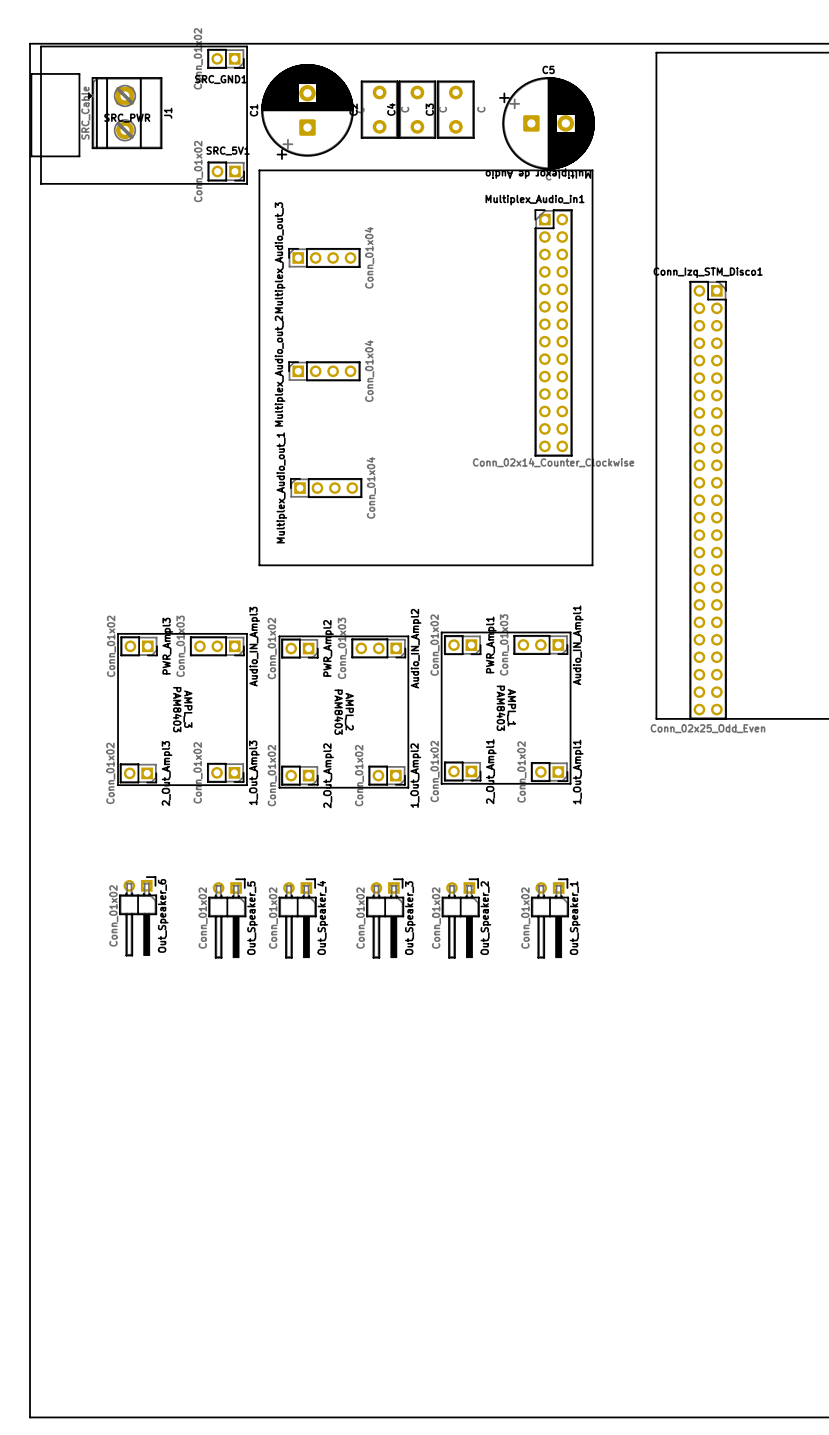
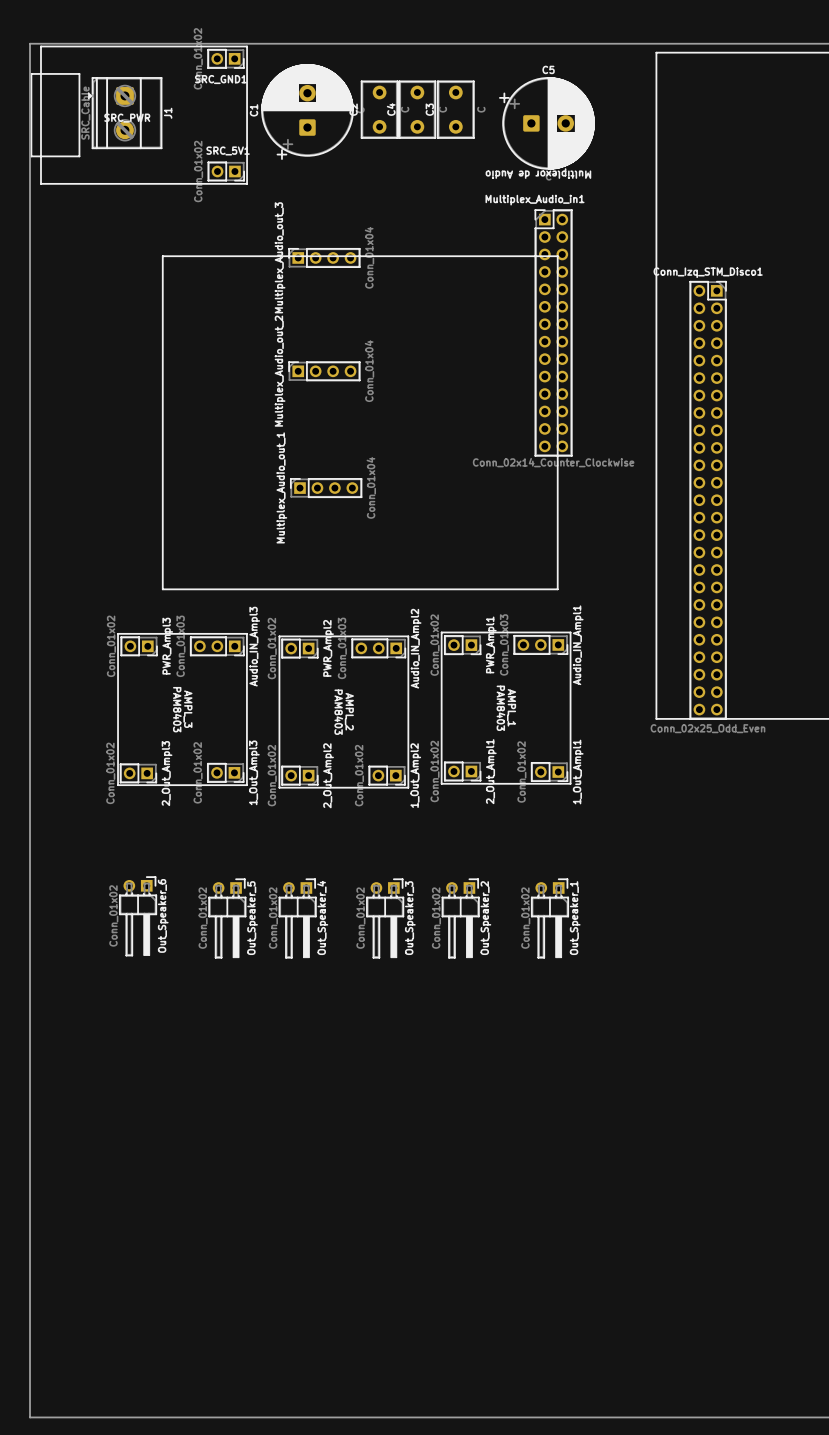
line: (259, 170) (592, 170) (592, 565) (259, 565) (259, 170) -> (162, 256) (162, 589) (557, 589) (557, 256) (162, 256)

